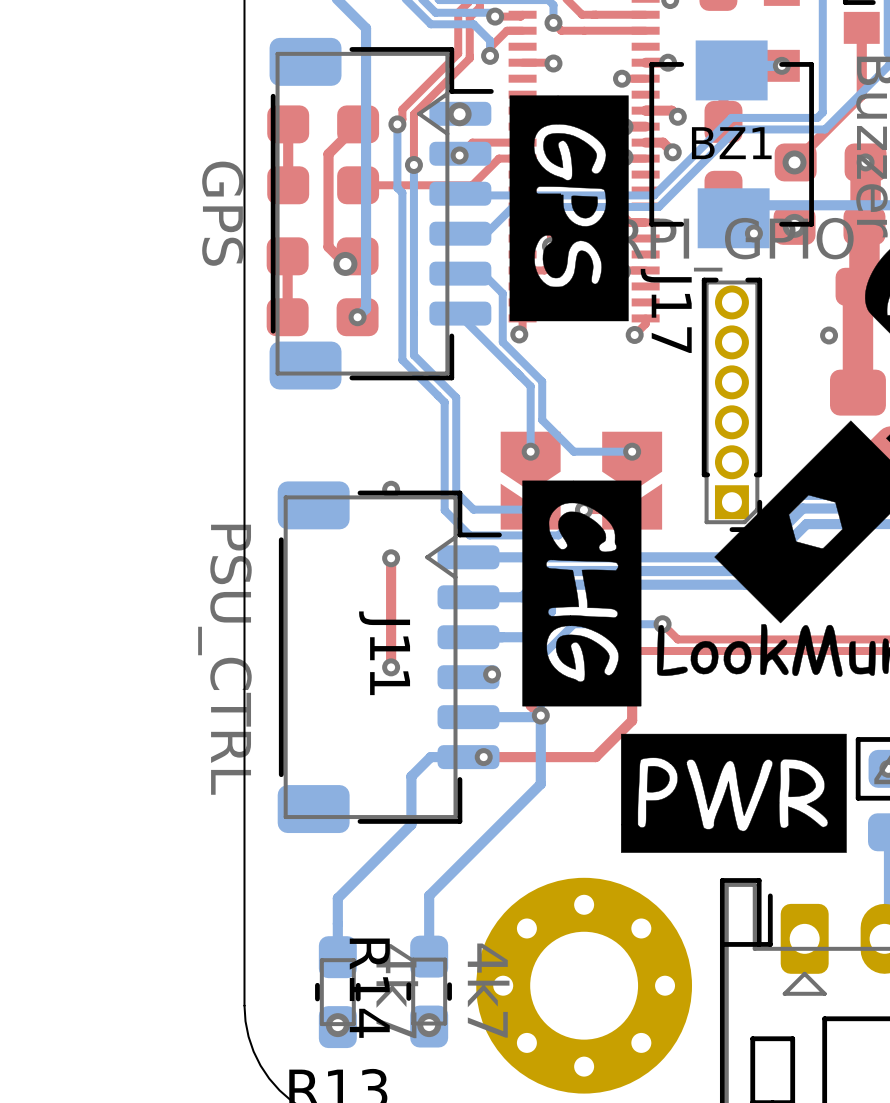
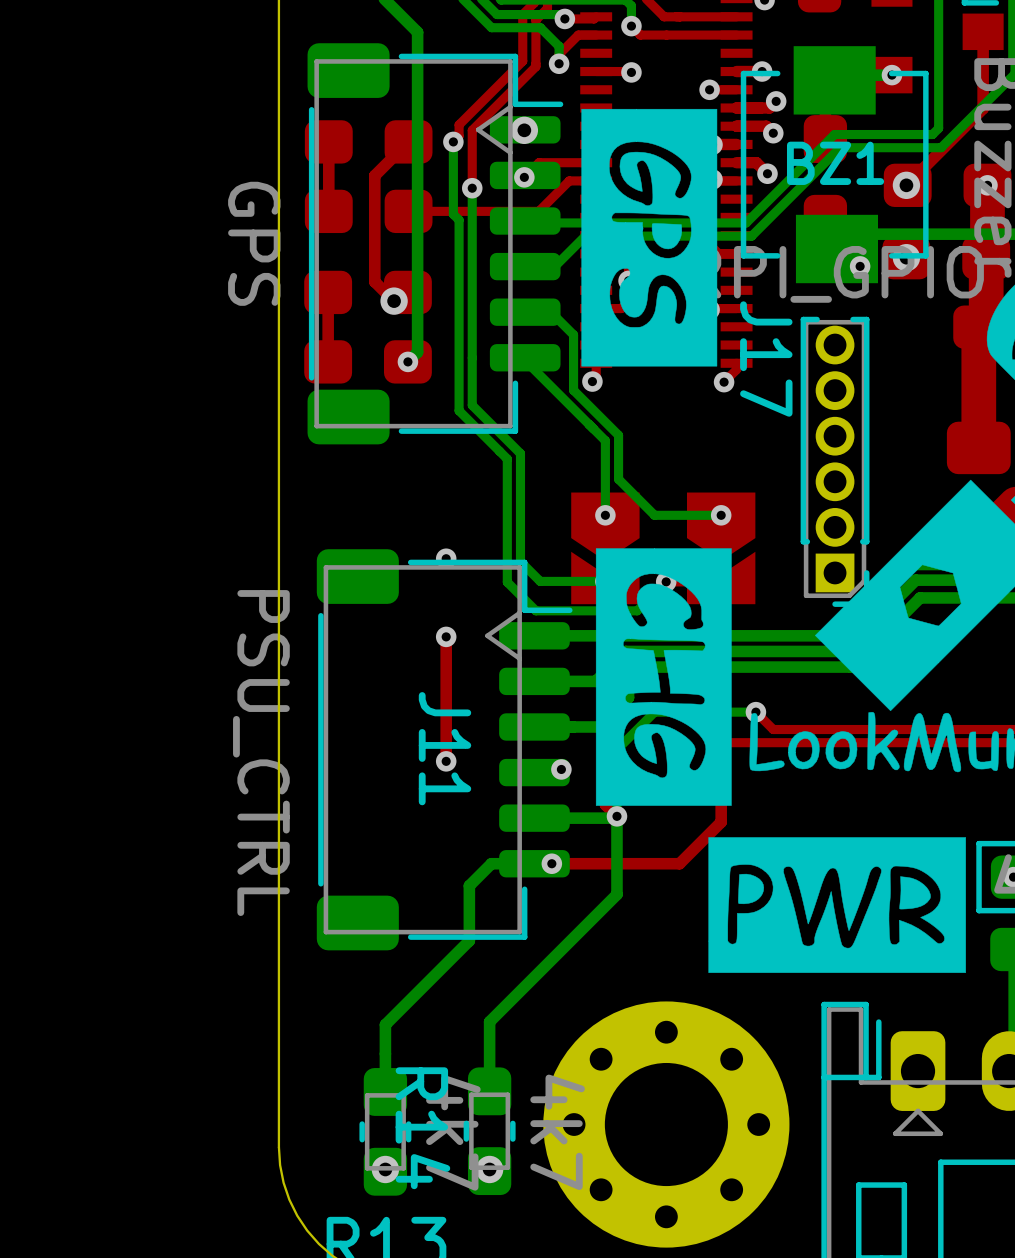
top track: none -> (776, 101) (769, 107) (736, 107)
via: none -> (776, 101)
via: (829, 335) -> none

